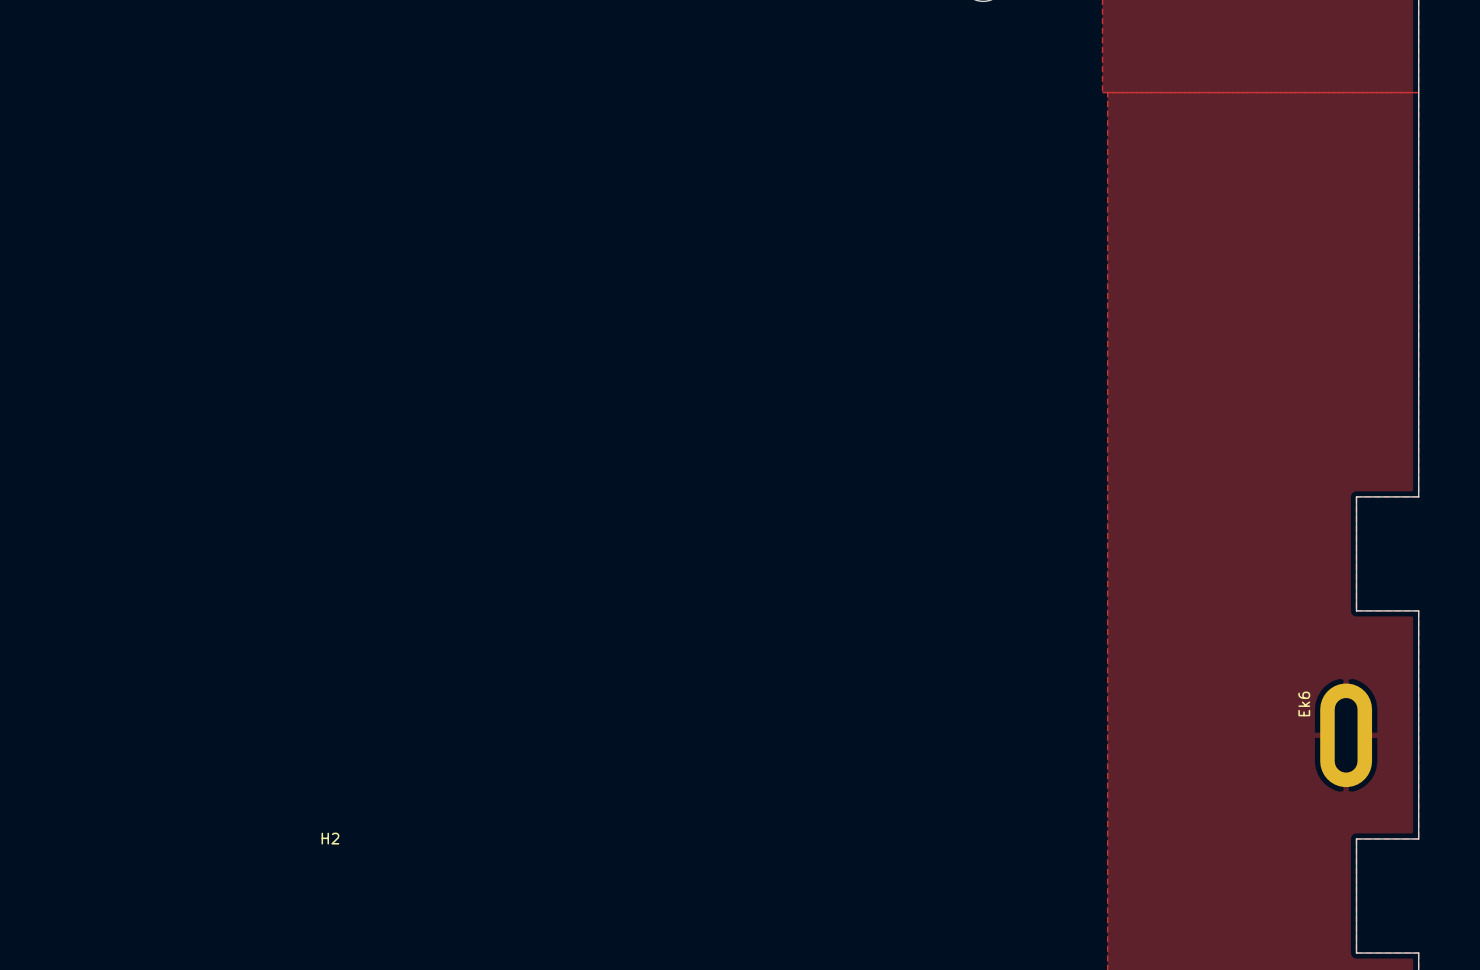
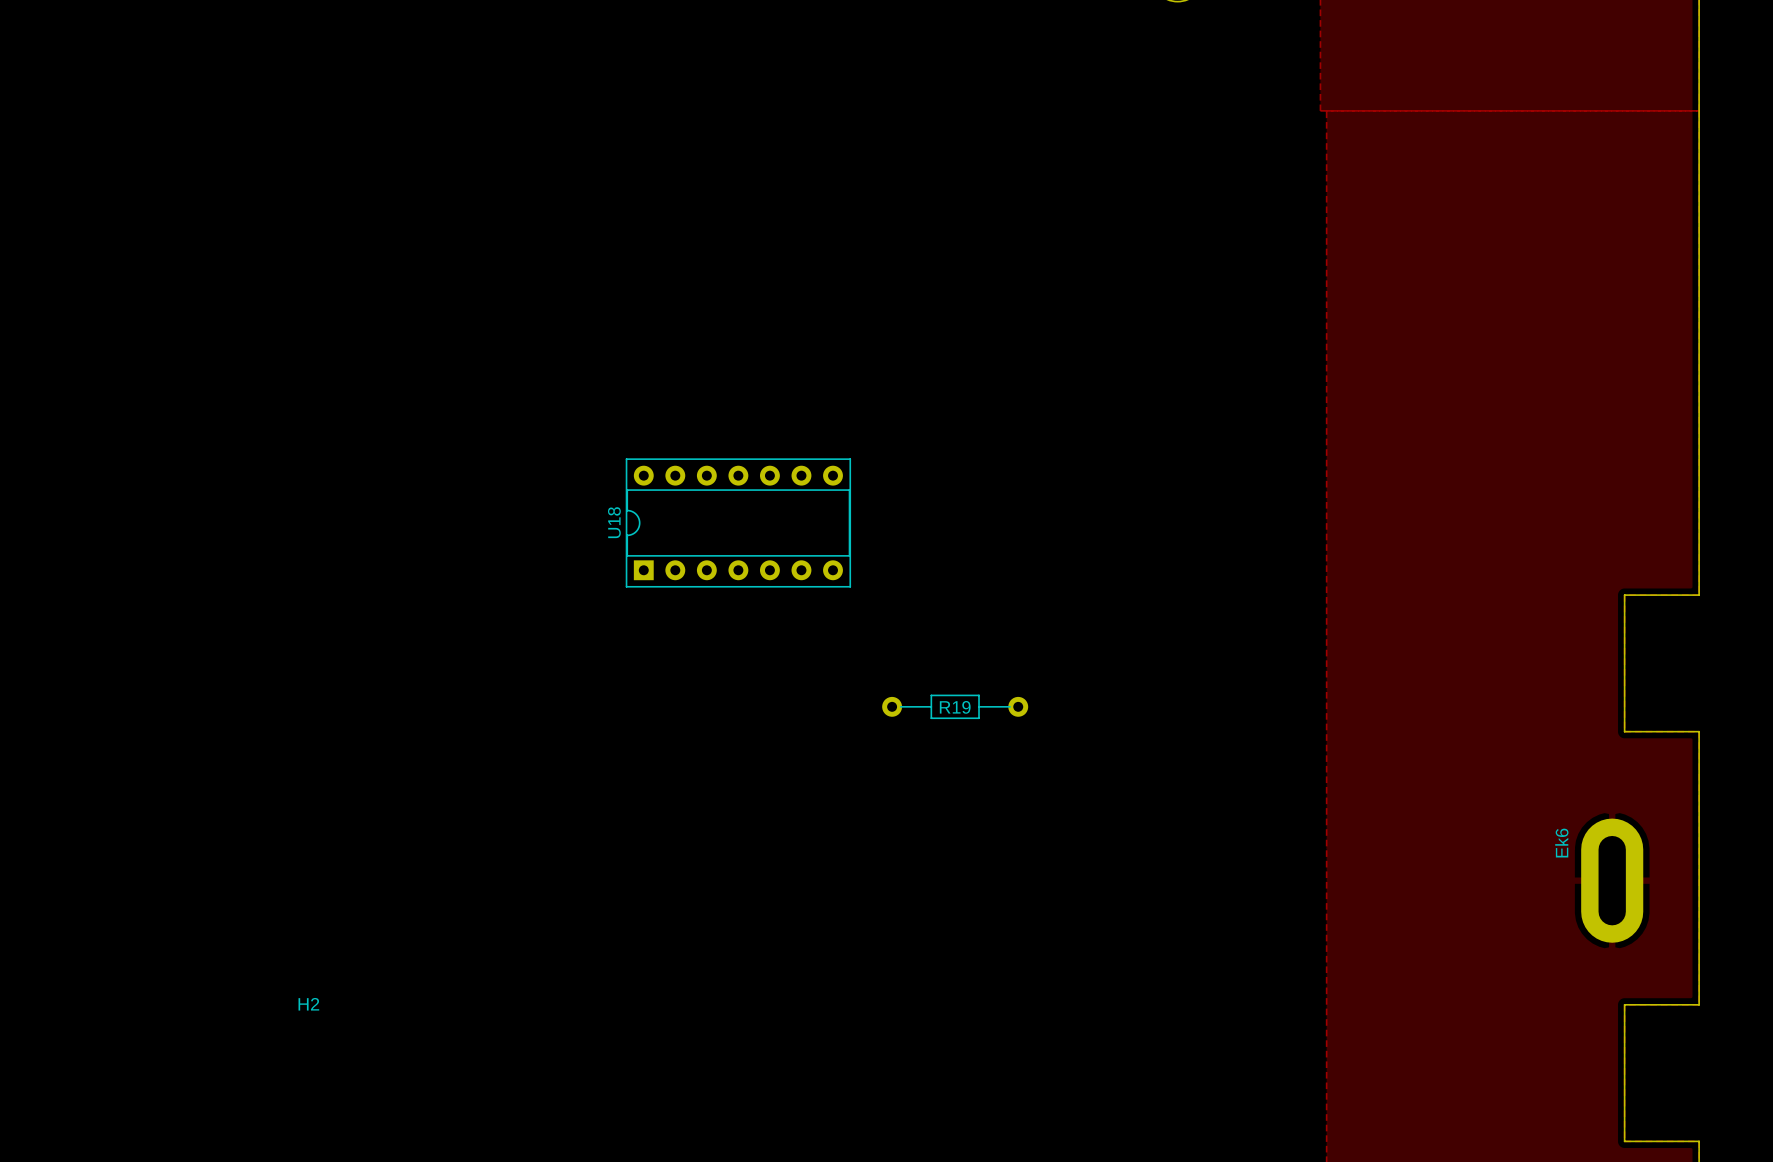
U18: none -> (738, 522)
R19: none -> (955, 706)
H2 name position: H2 (330, 838) -> H2 (308, 1004)

